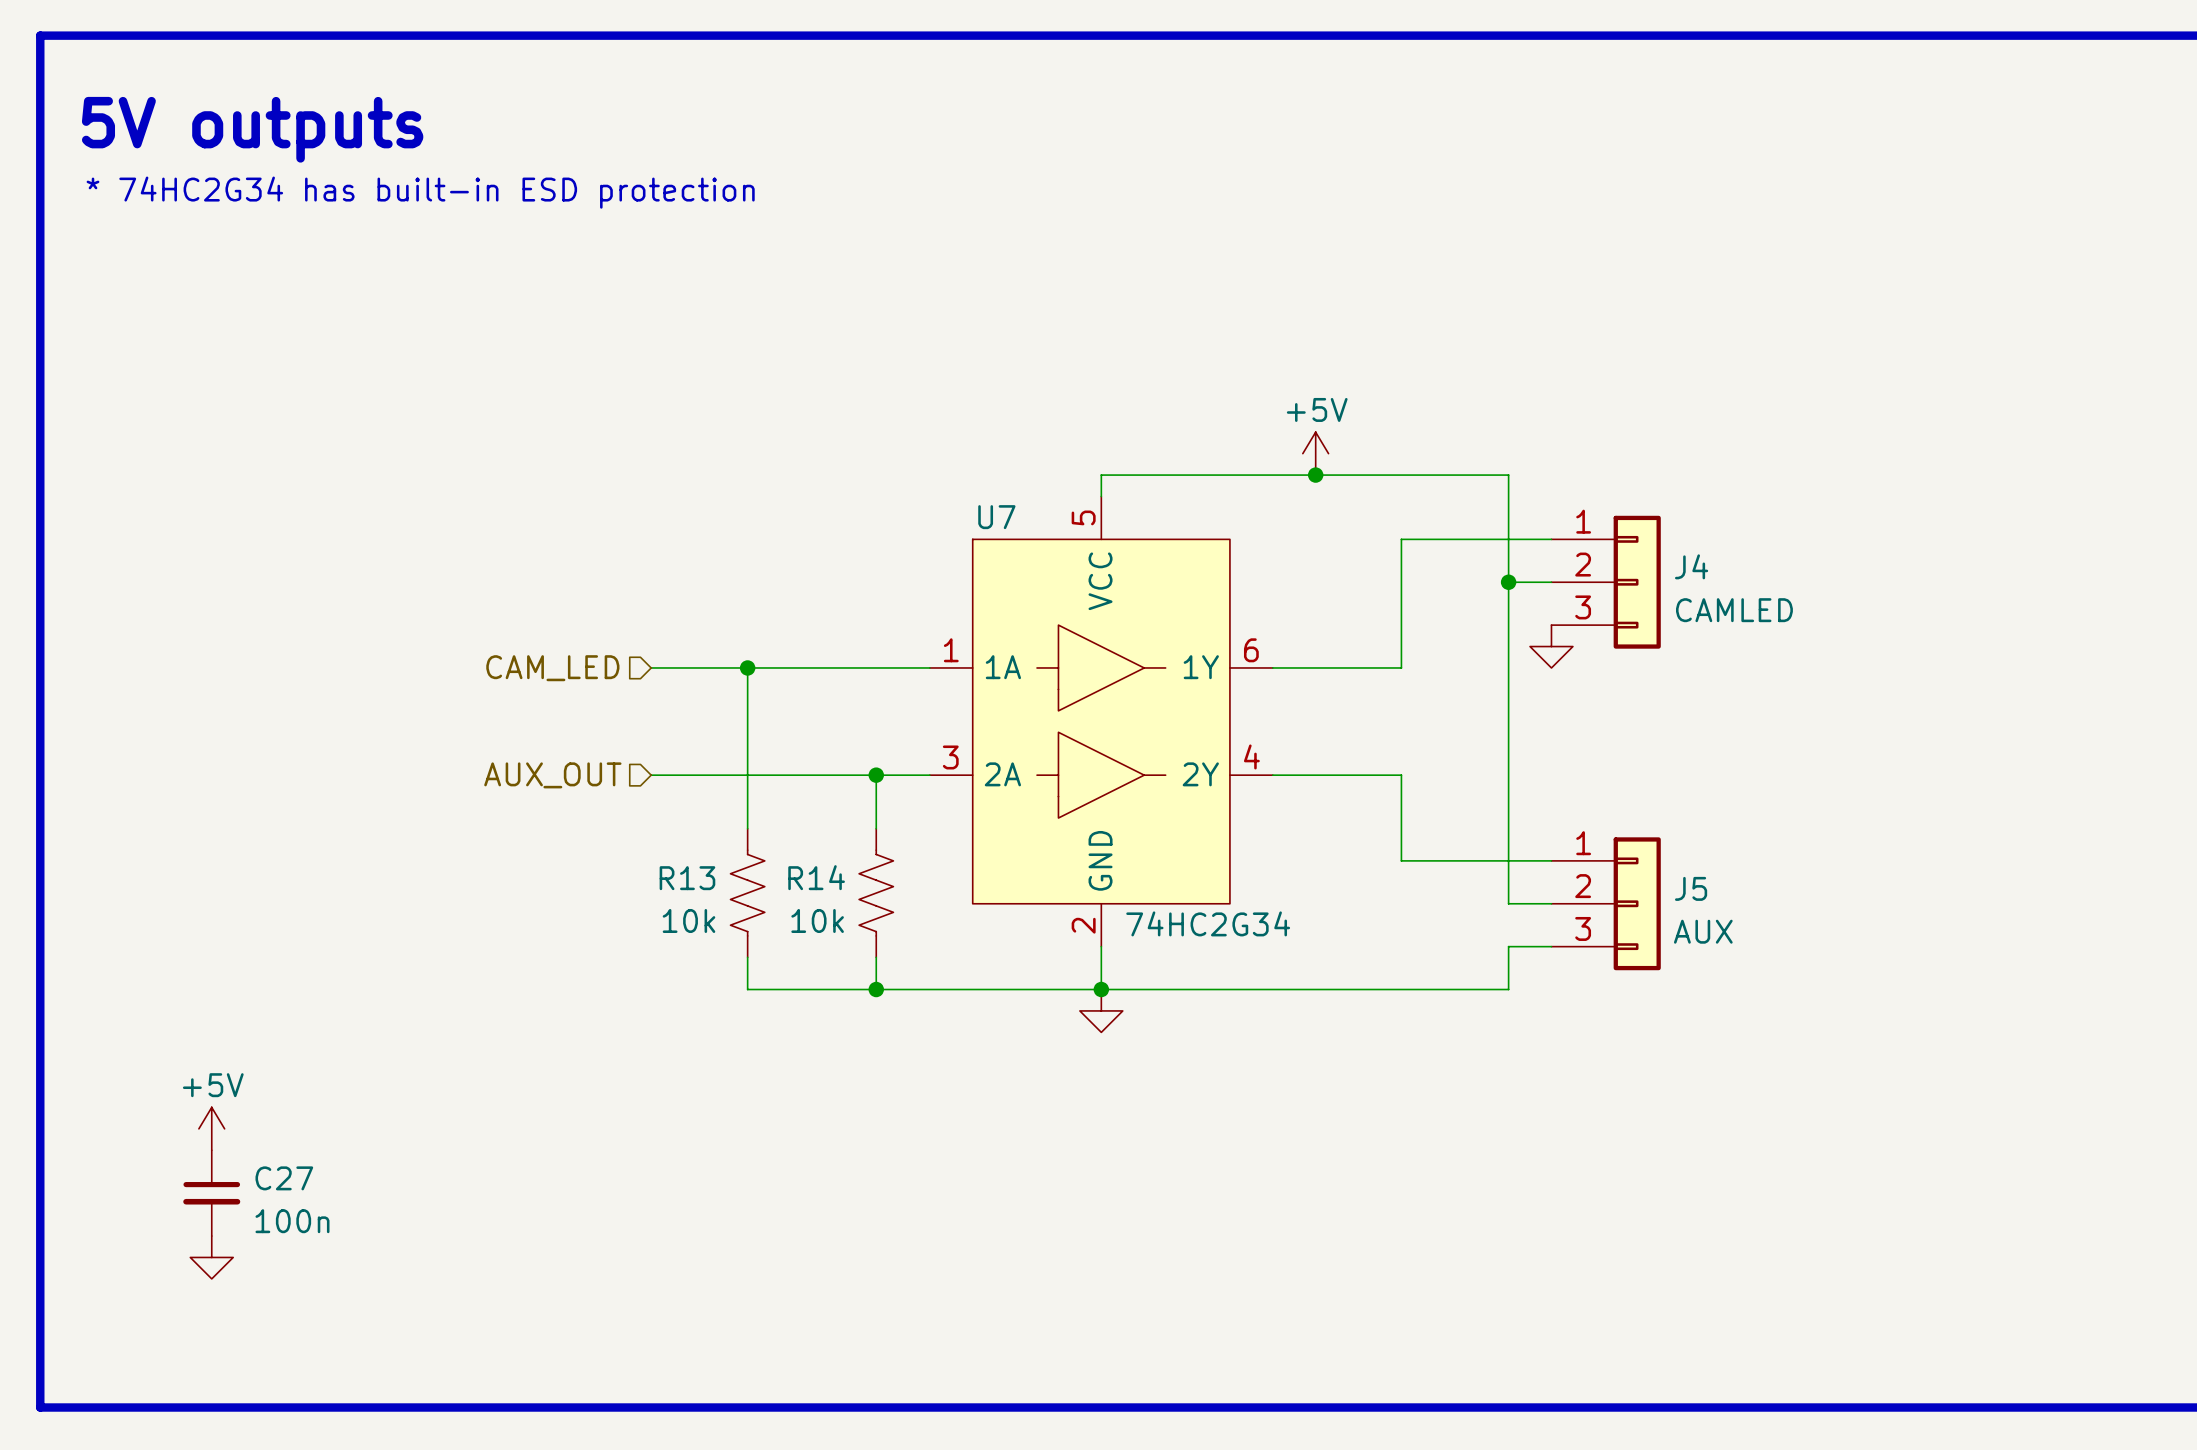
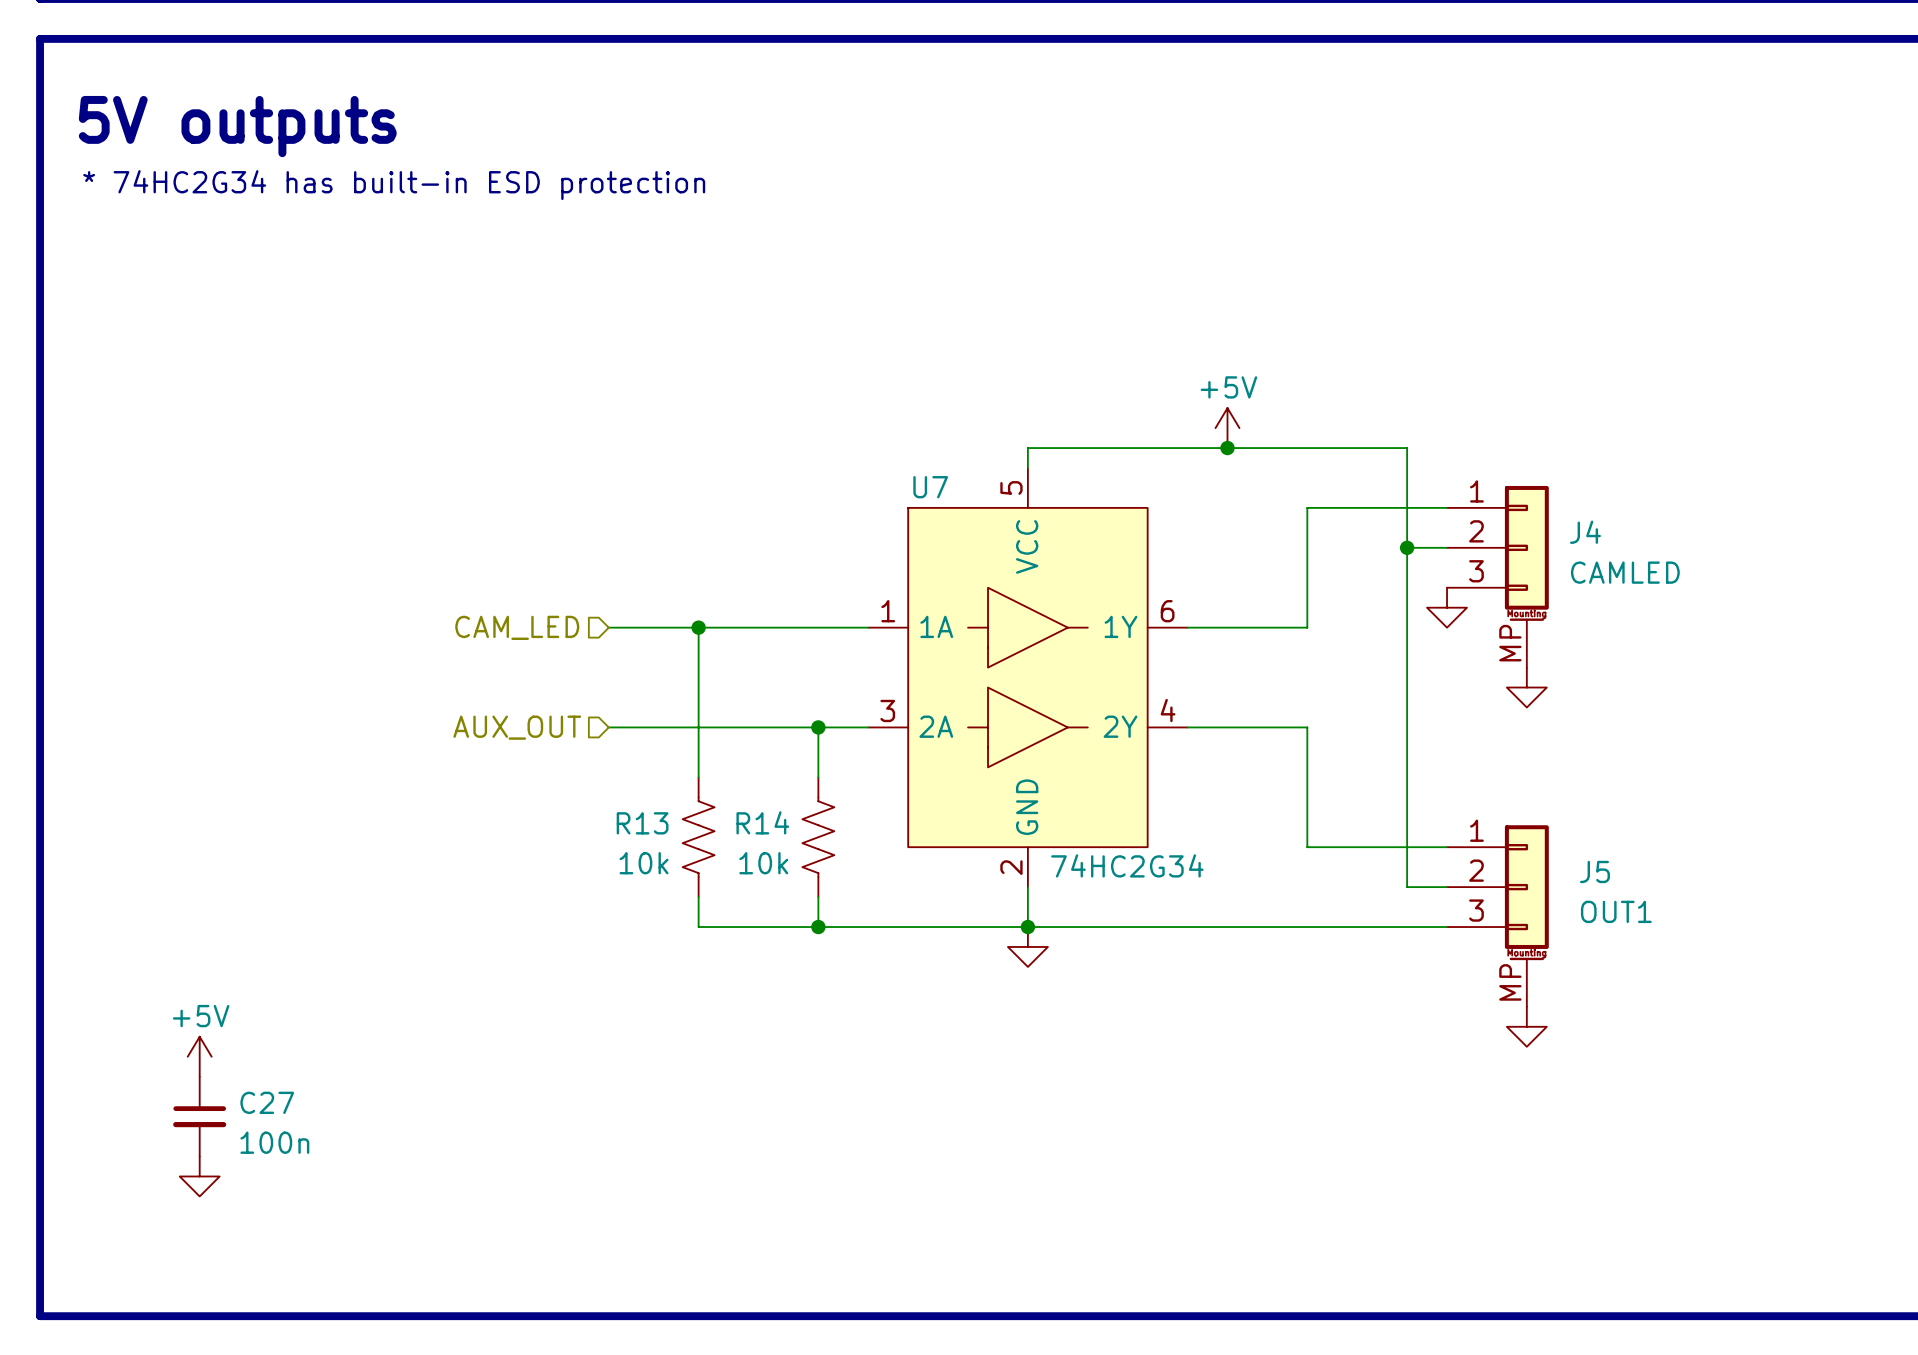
J4 symbol: [1551, 515, 1661, 649] -> [1447, 485, 1549, 668]
power symbol: none -> (1526, 687)
J5 symbol: [1551, 837, 1661, 971] -> [1447, 825, 1549, 1007]
wire: (1401, 860) (1551, 860) -> (1307, 807) (1307, 847) (1407, 847) (1407, 887)
J5 name position: J5 (1691, 888) -> J5 (1594, 871)
J5 value: AUX (1703, 931) -> OUT1 (1616, 911)
wire: (1508, 946) (1508, 989) -> (1447, 927) (1407, 927)
power symbol: none -> (1526, 1026)

